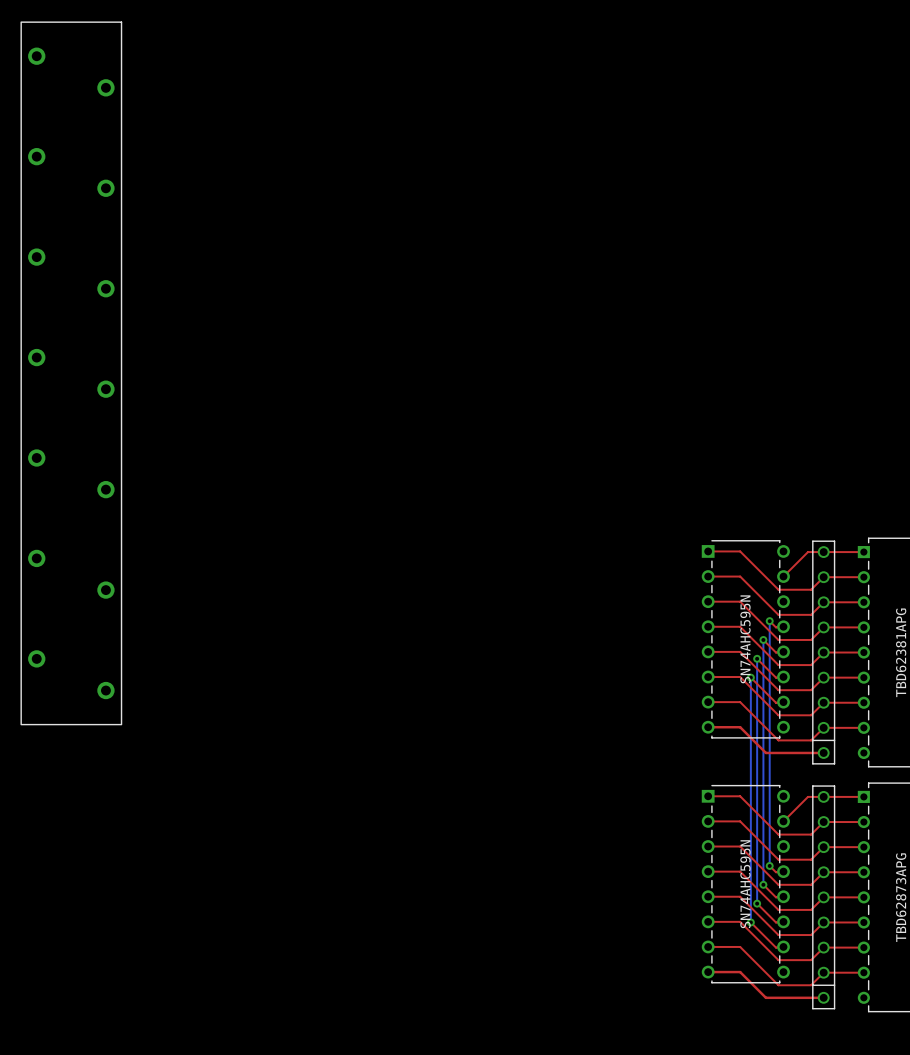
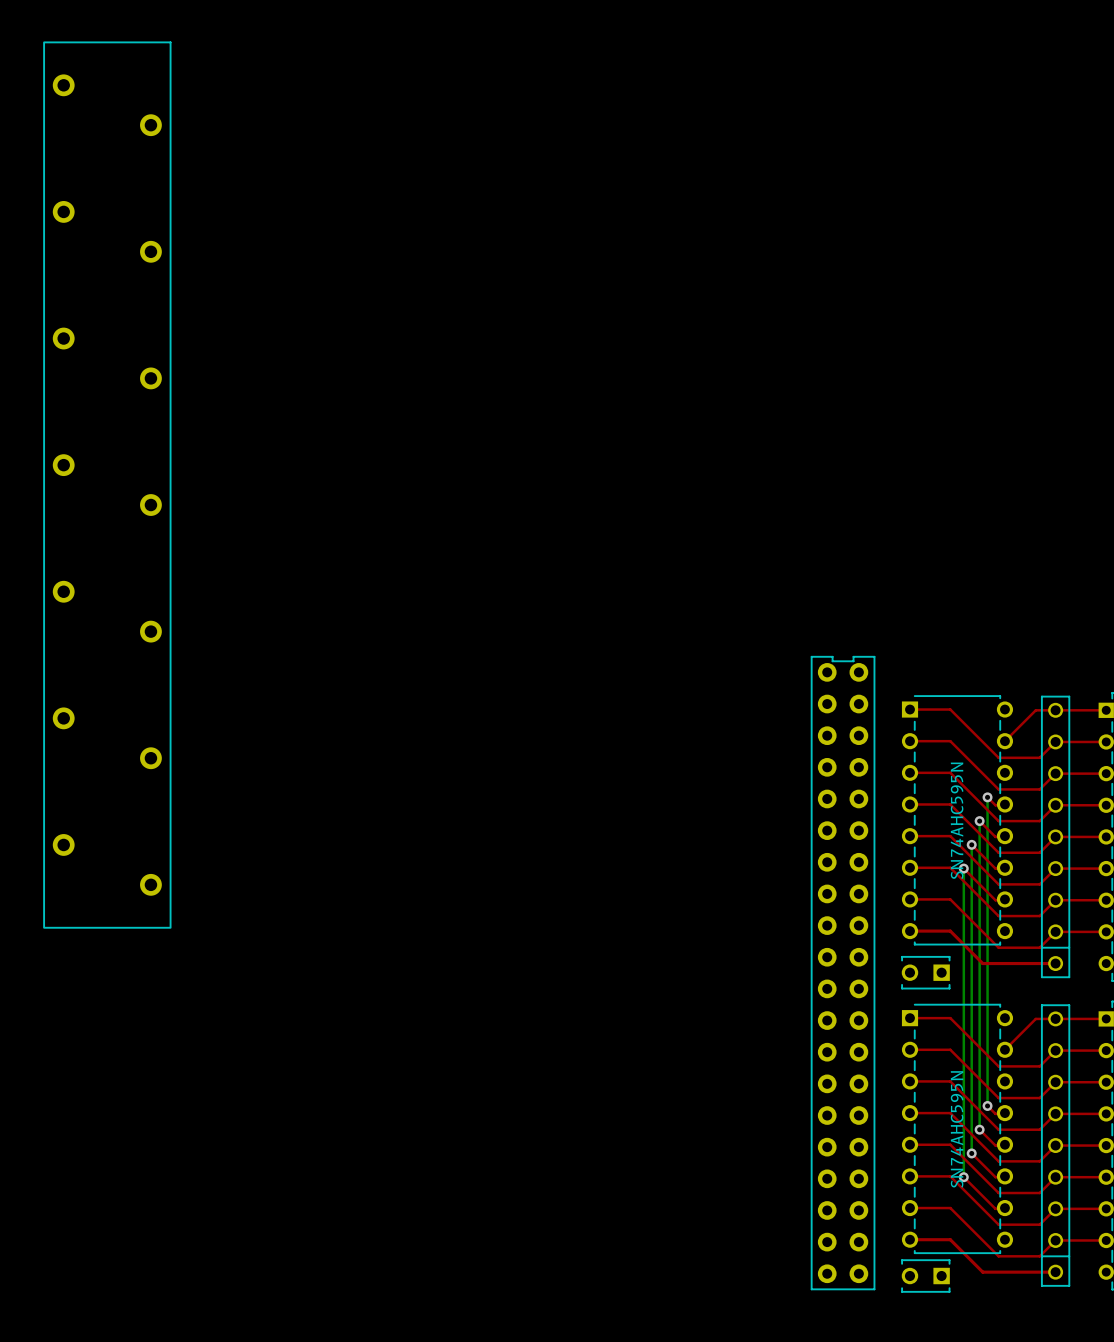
part: none -> (843, 973)
part: none -> (925, 972)
part: none -> (925, 1276)

